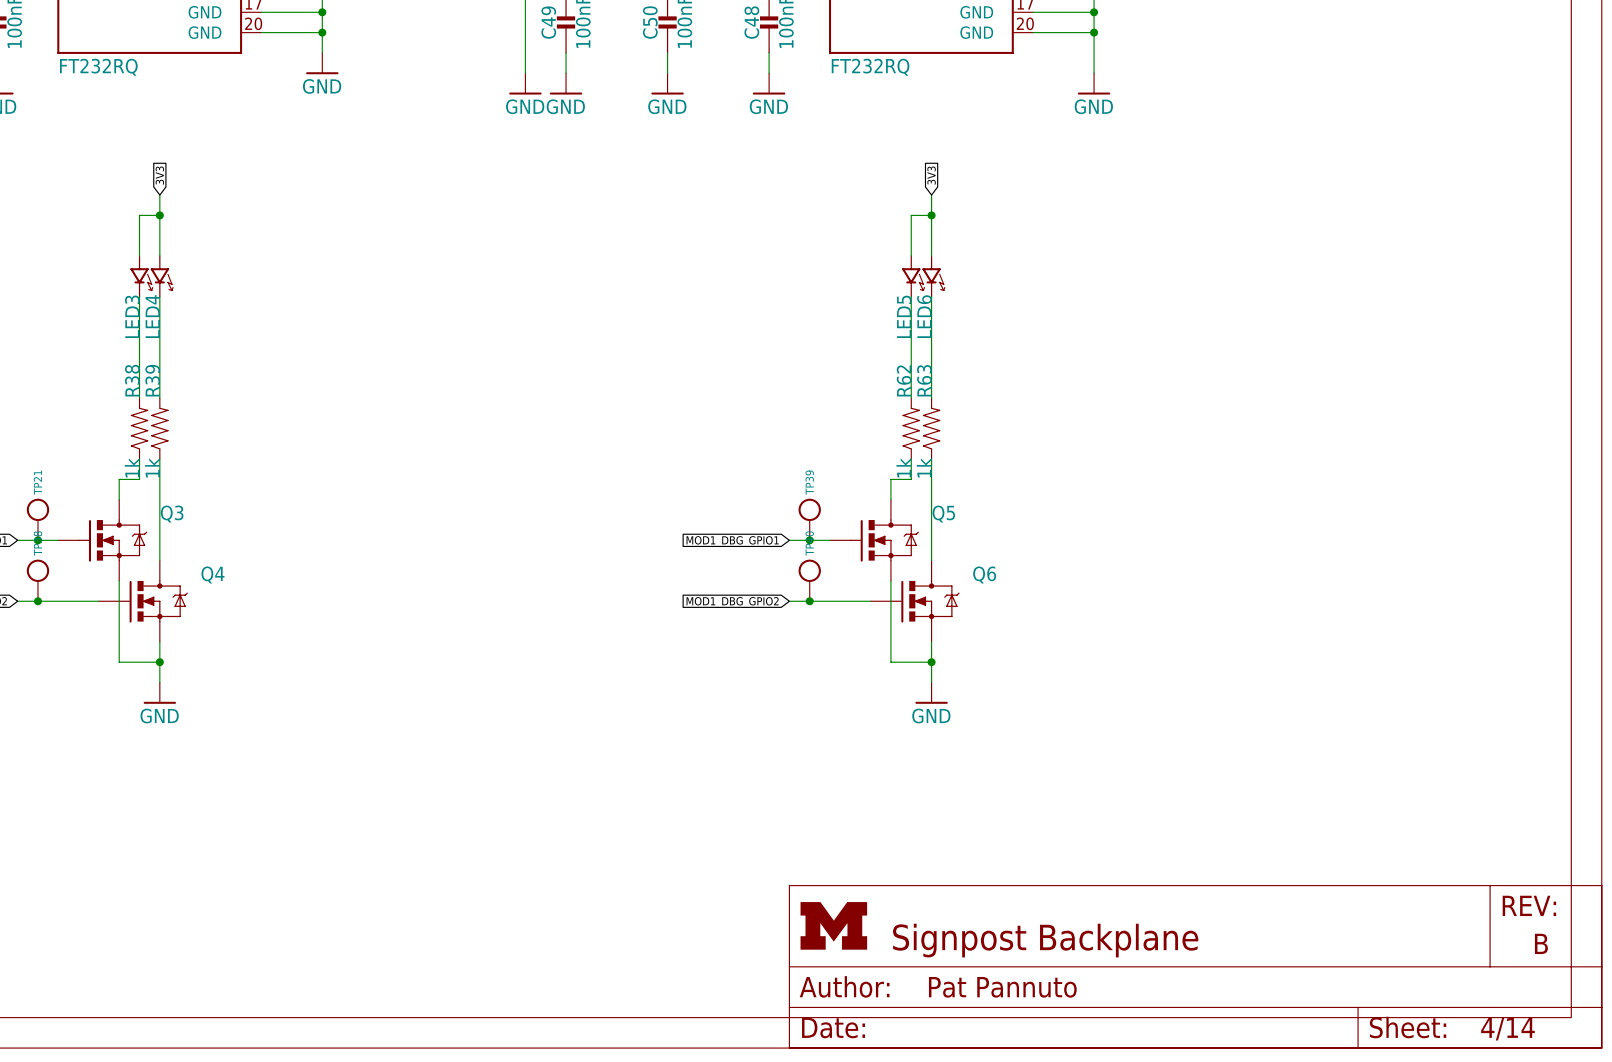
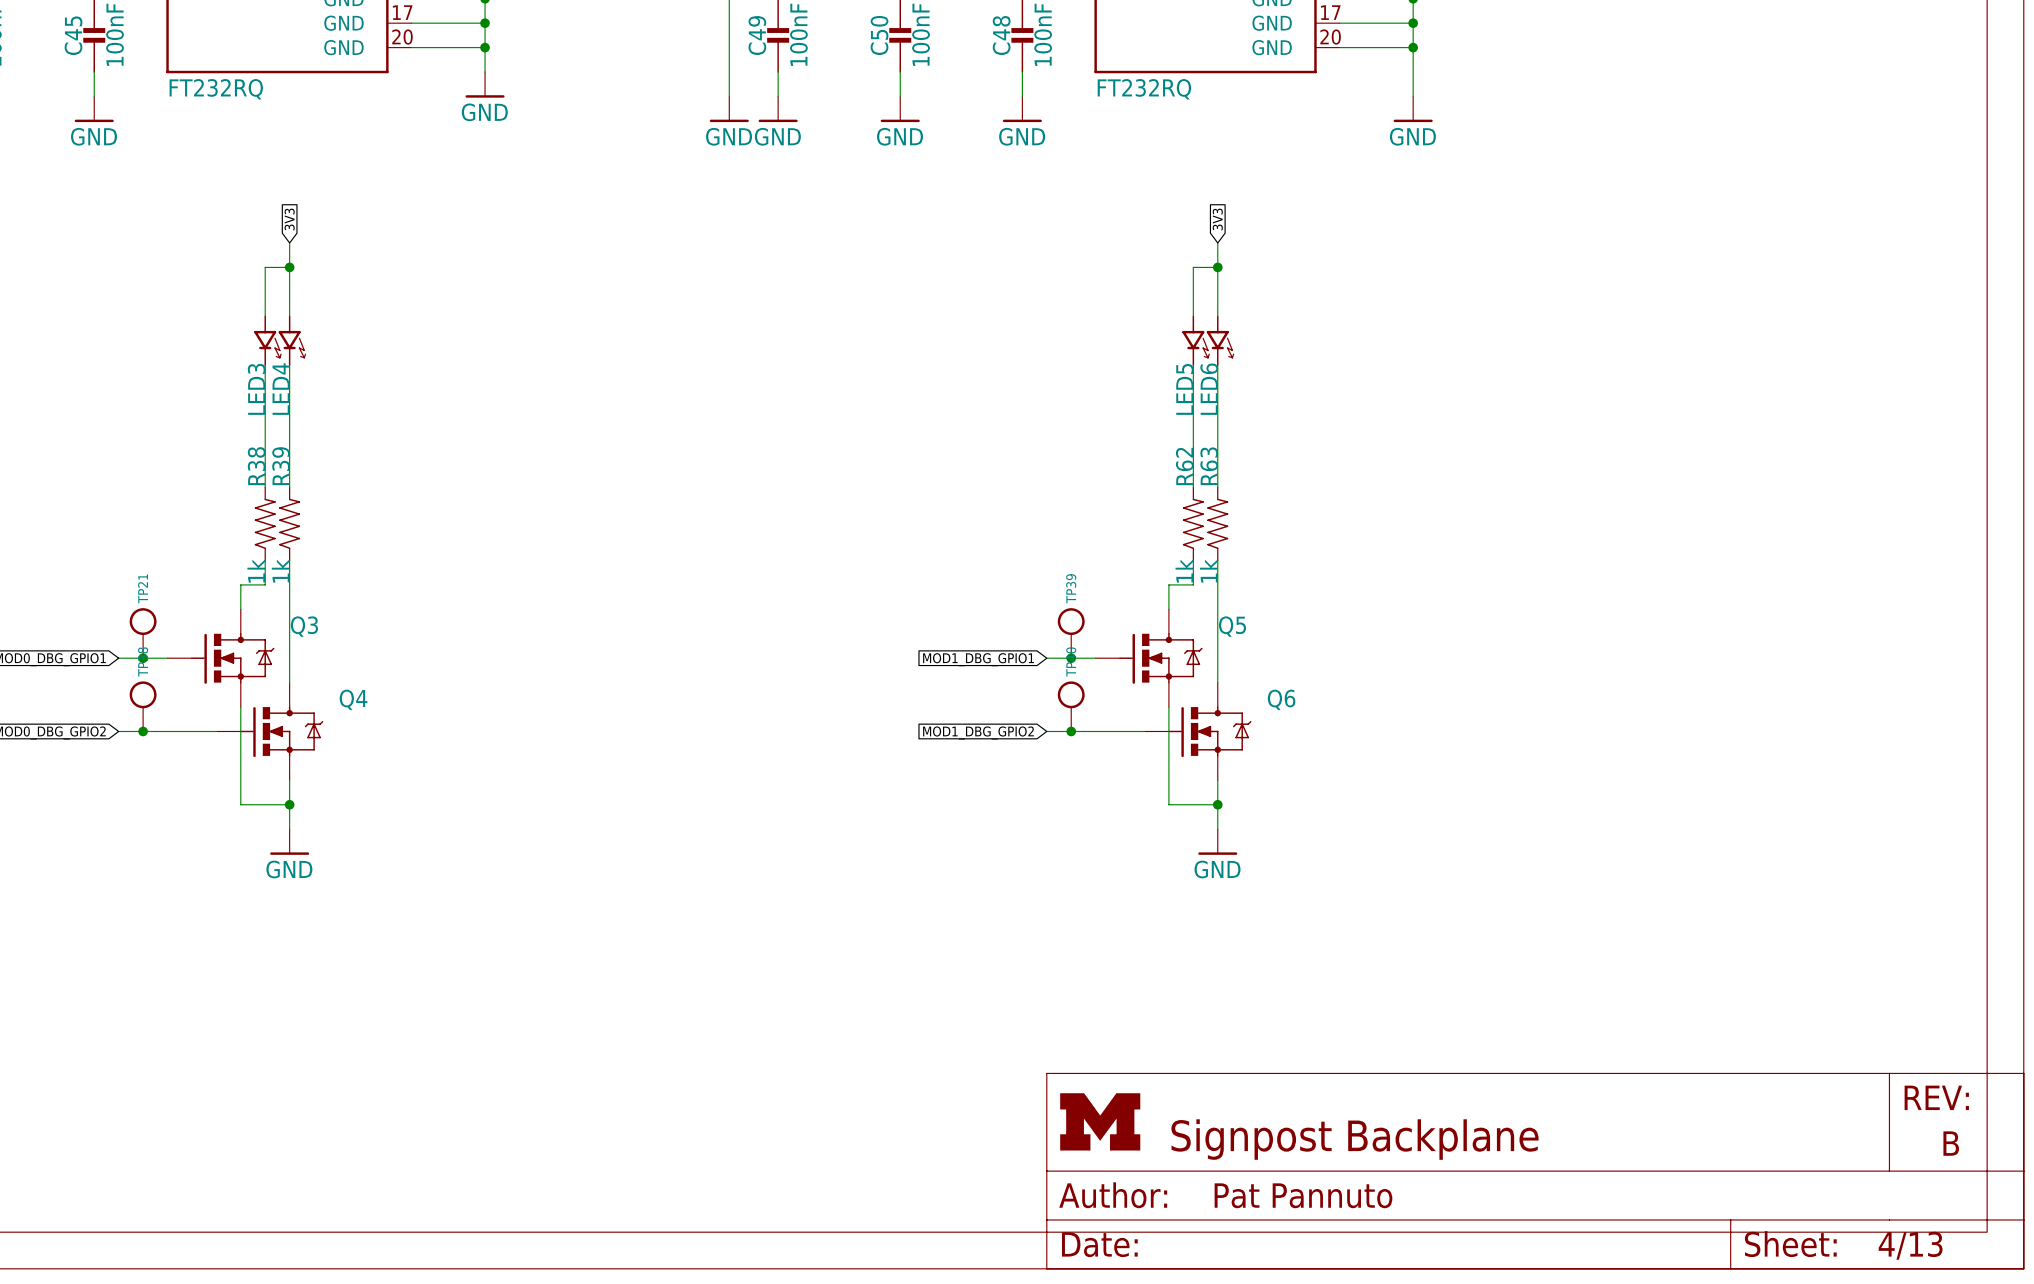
part text: 4/14 (1507, 1029) -> 4/13 (1910, 1245)

